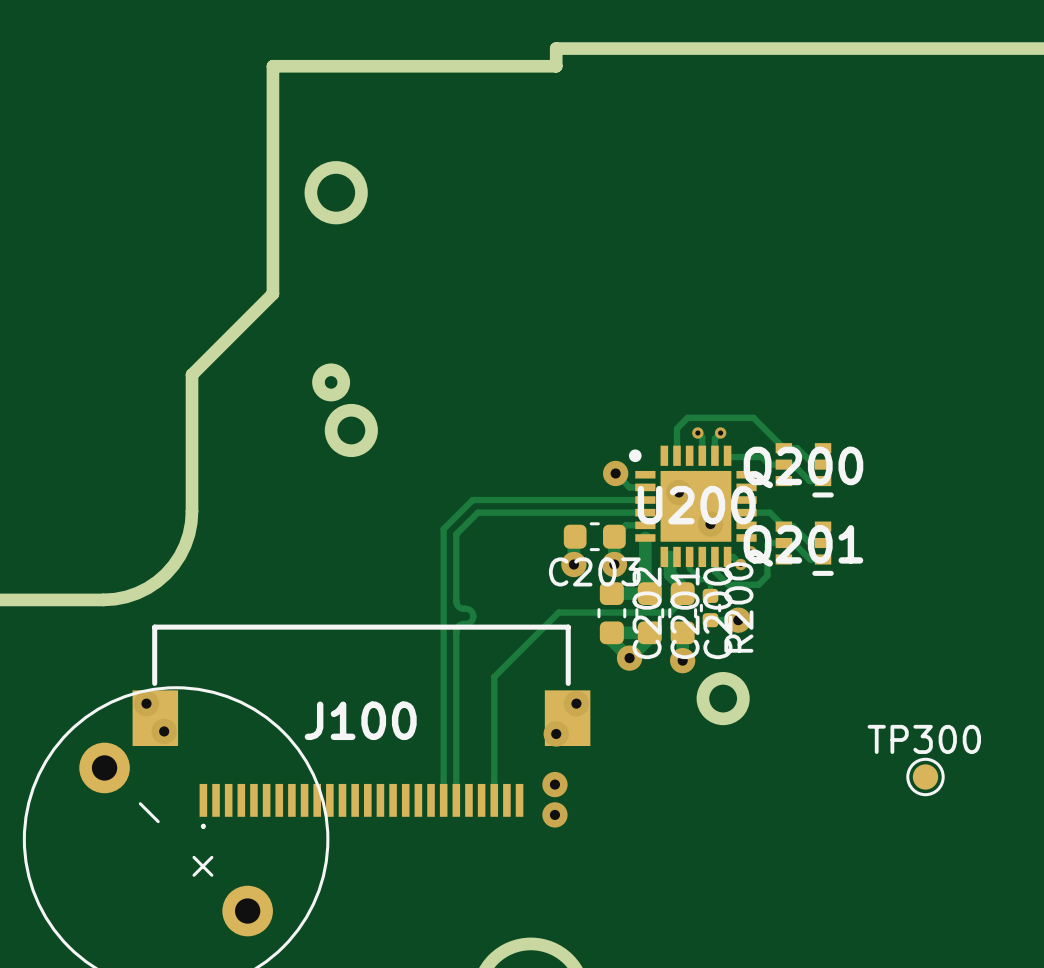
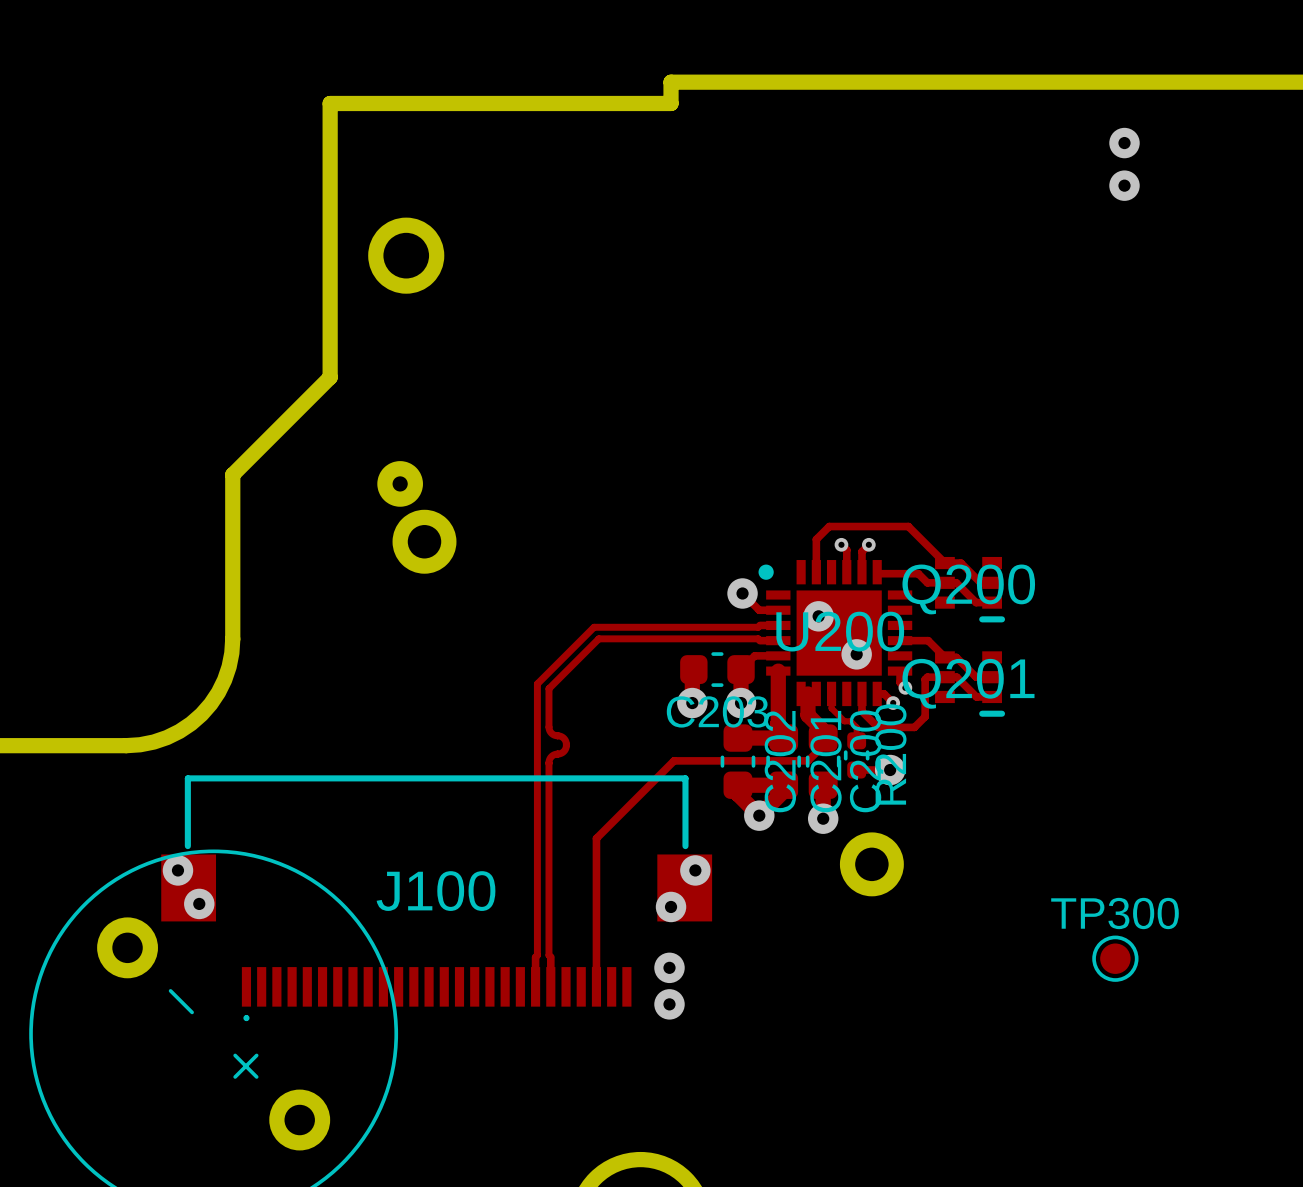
via: none -> (1124, 143)
via: none -> (1124, 185)
track: (630, 500) (472, 500) (443, 529) (443, 775) -> (760, 625) (758, 627) (594, 627) (537, 683) (537, 955) (535, 957)
track: (630, 512) (477, 512) (456, 534) (456, 603) (460, 607) (470, 610) (473, 616) (470, 622) (460, 624) (456, 630) (456, 775) -> (760, 640) (758, 638) (598, 638) (548, 688) (549, 729) (553, 734) (563, 737) (566, 744) (563, 751) (553, 755) (549, 761) (548, 955) (550, 957)

